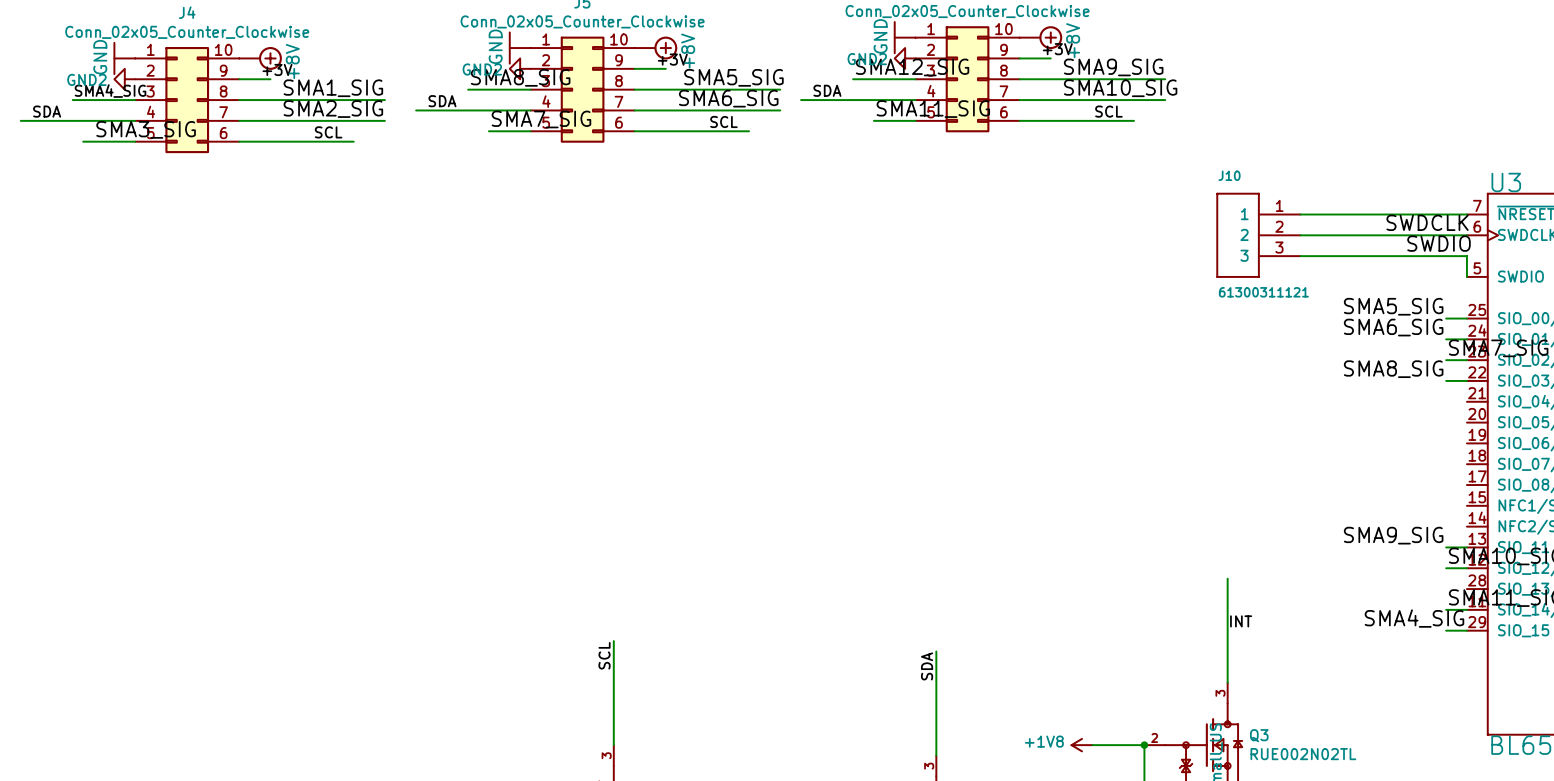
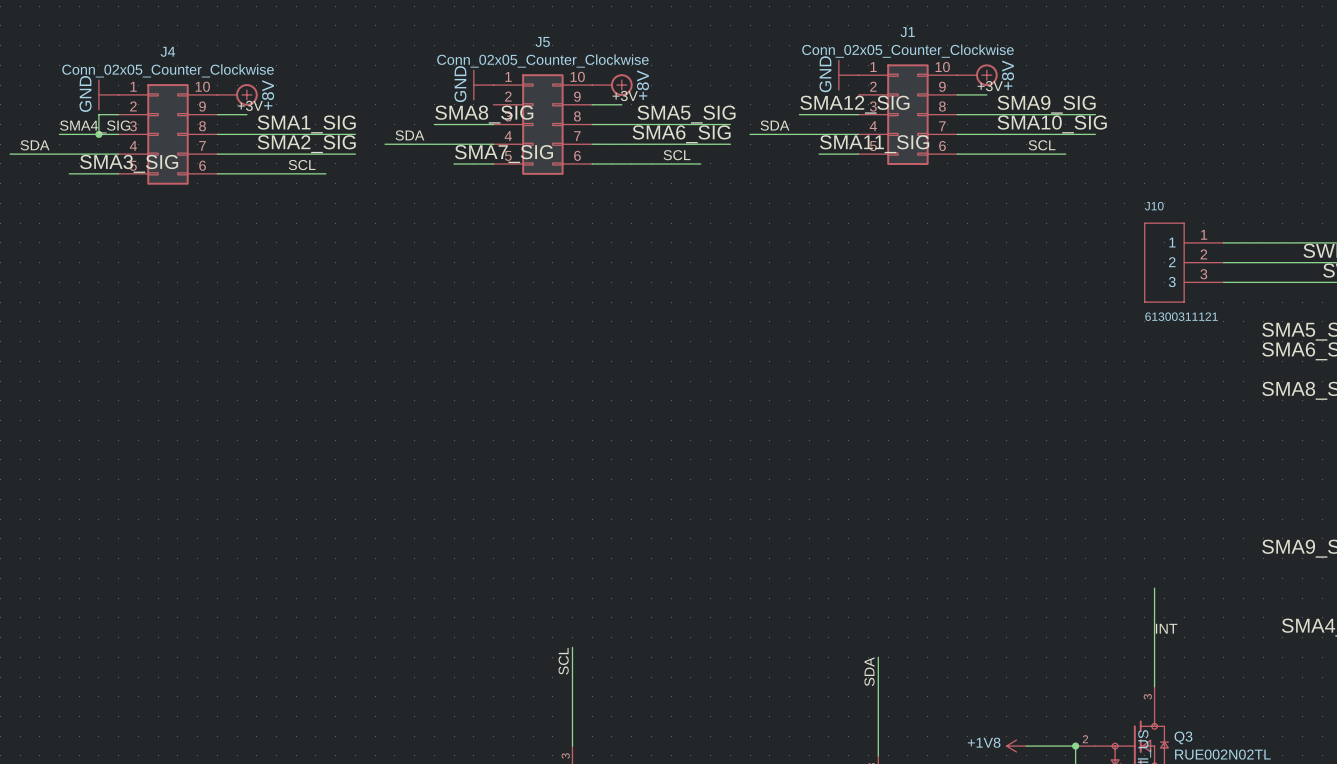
power symbol: GND2 (905, 58) -> none
power symbol: GND2 (520, 68) -> none
power symbol: GND2 (124, 79) -> none
wire: none -> (118, 114) (98, 114) (98, 134)
junction: none -> (98, 134)

